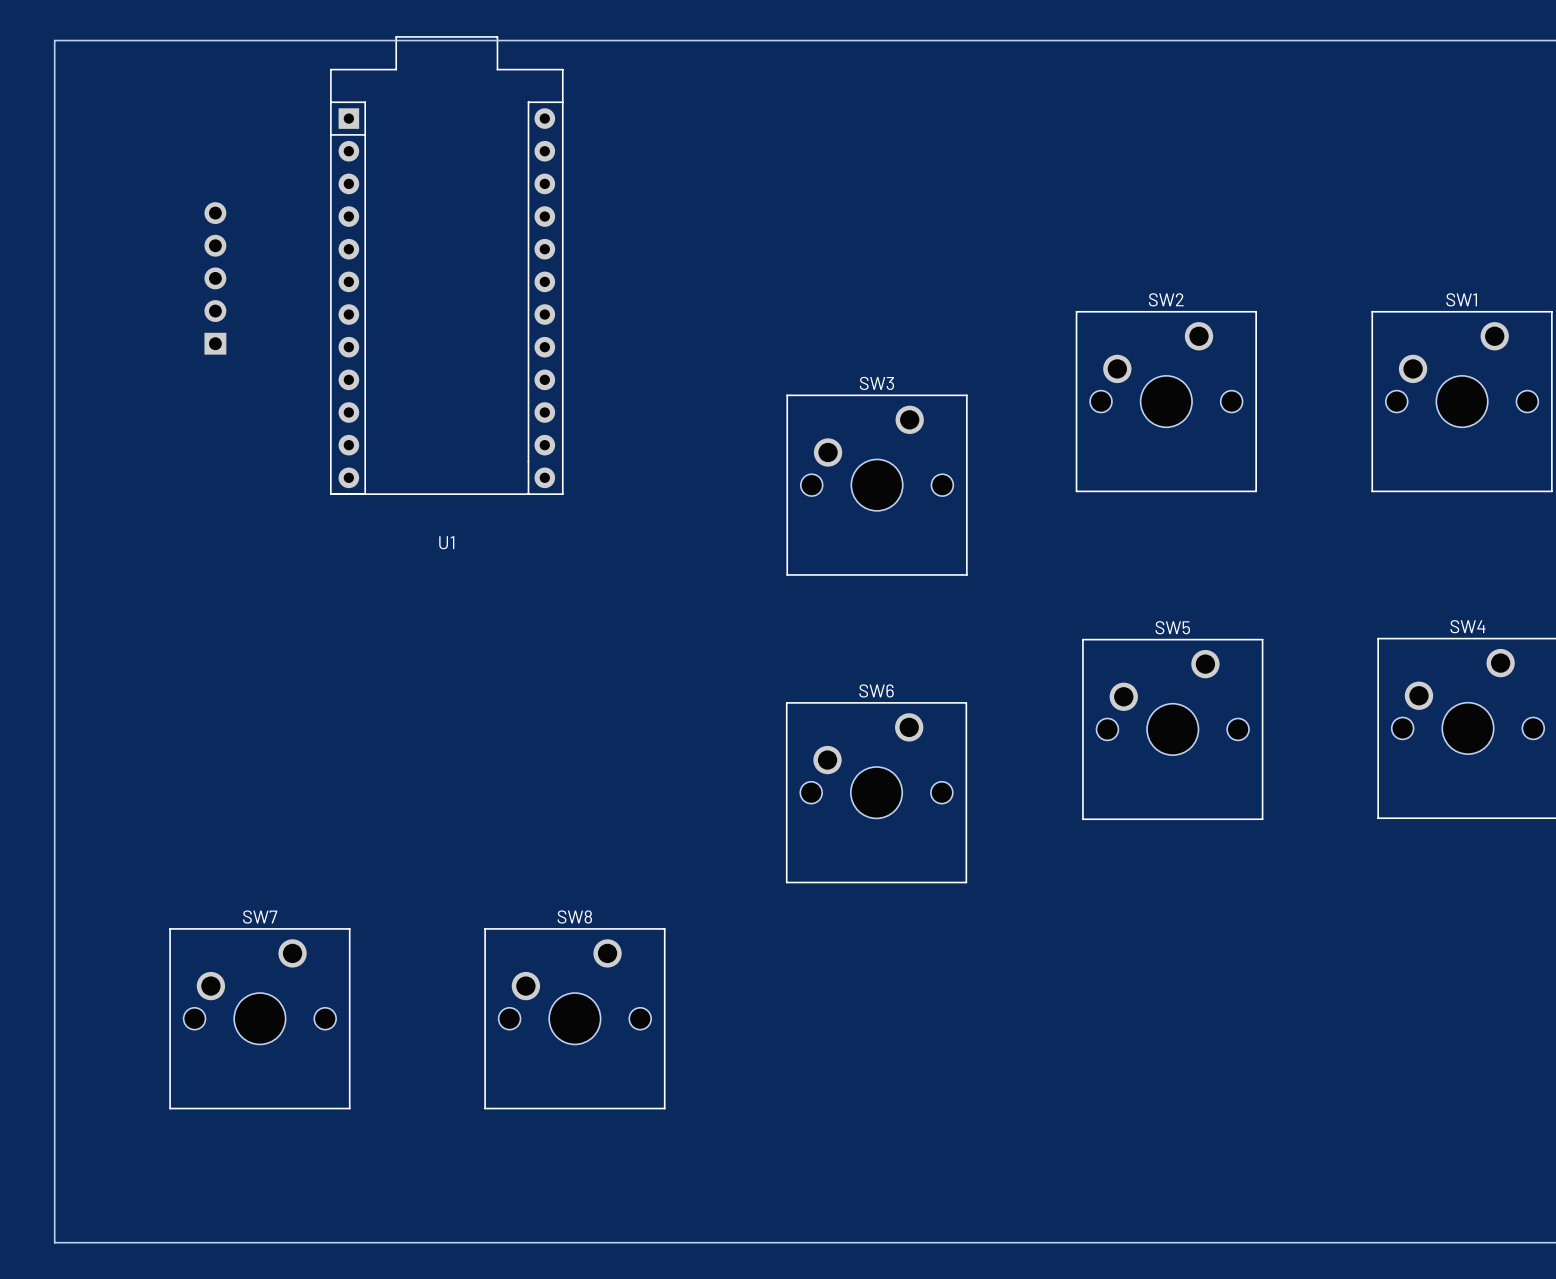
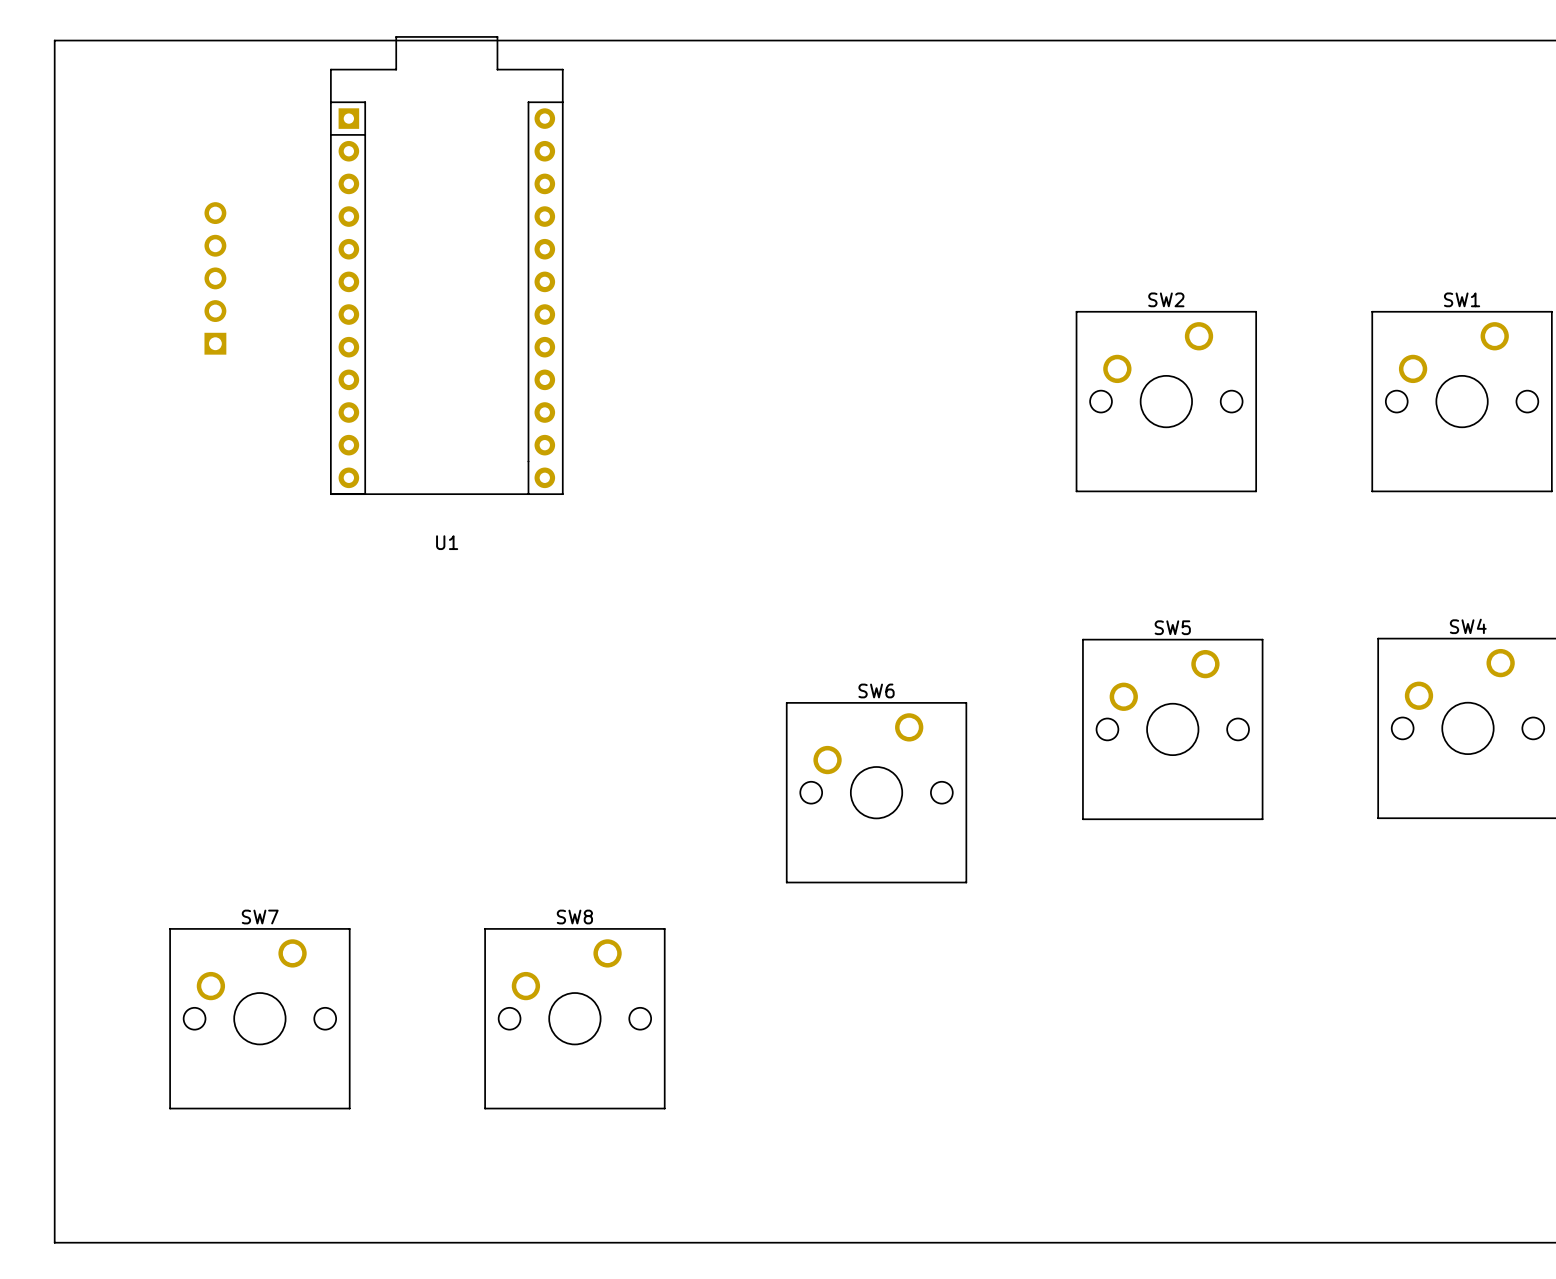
SW3: (877, 485) -> none

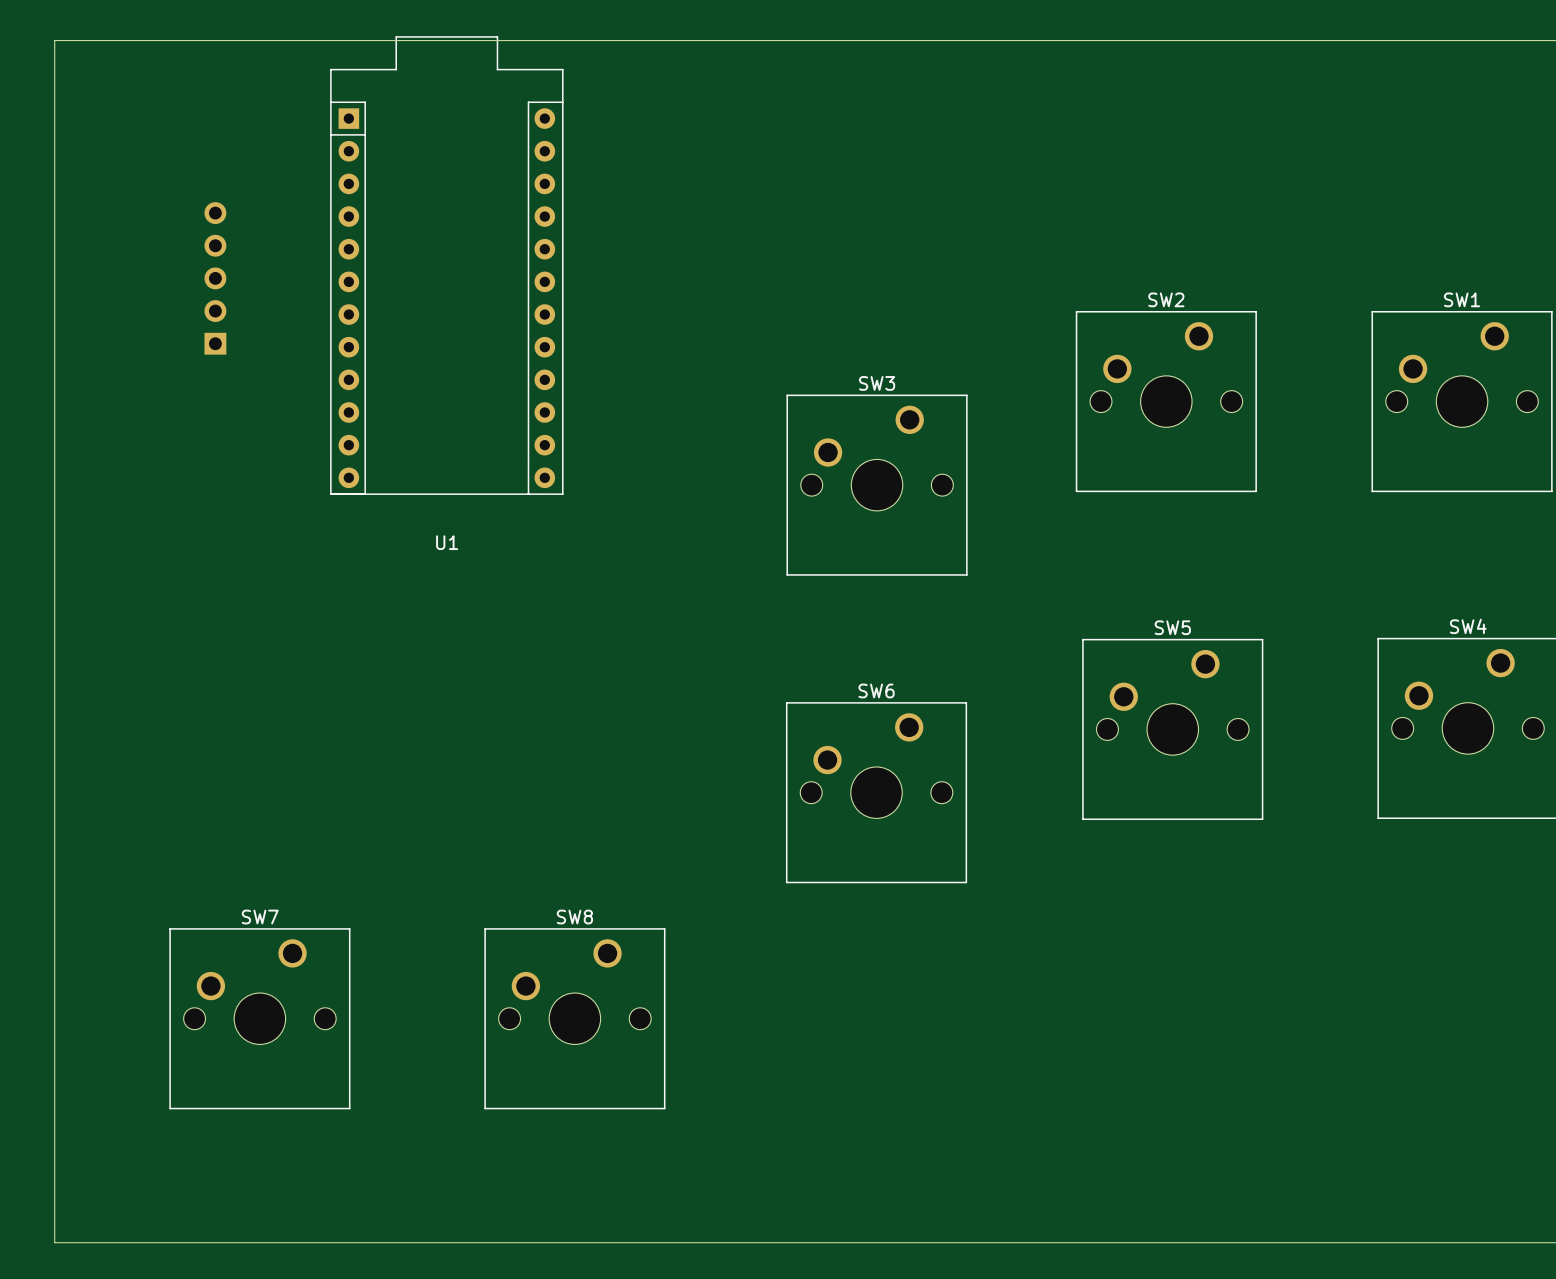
SW3: none -> (877, 485)

